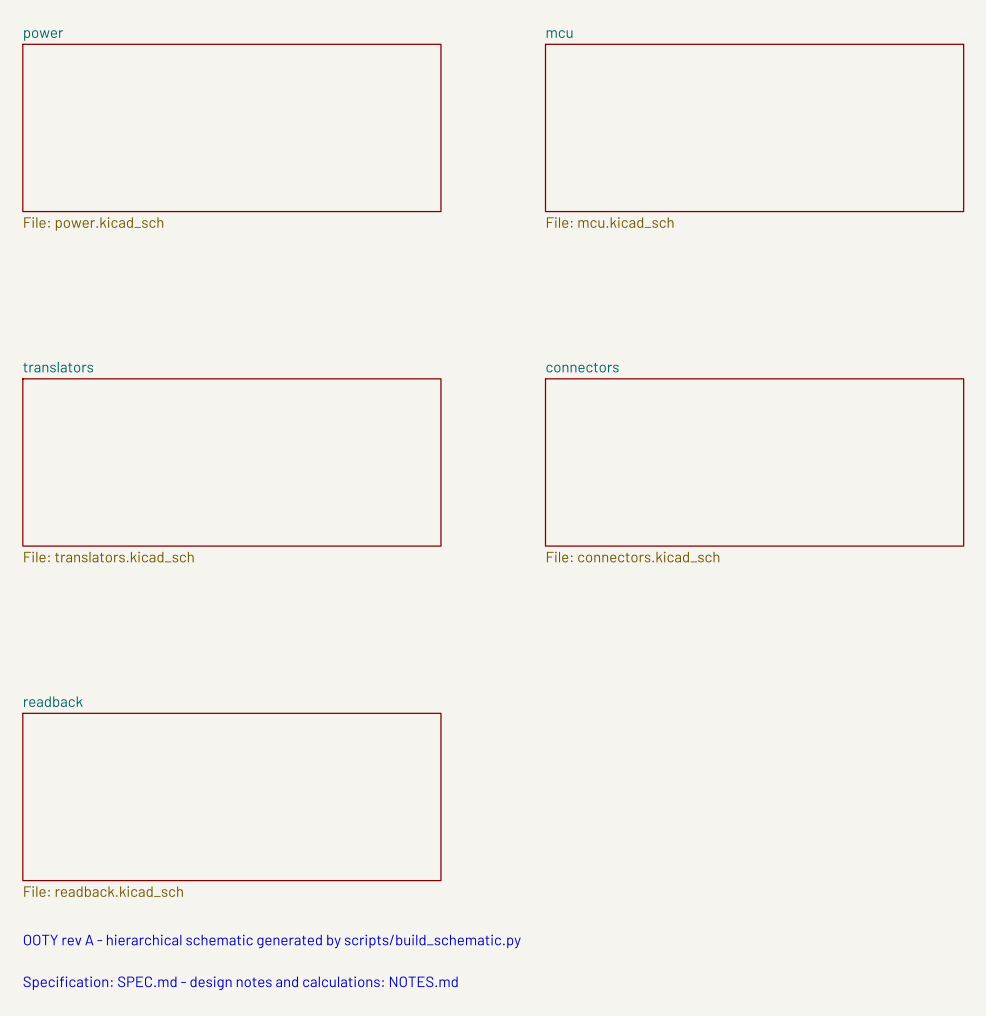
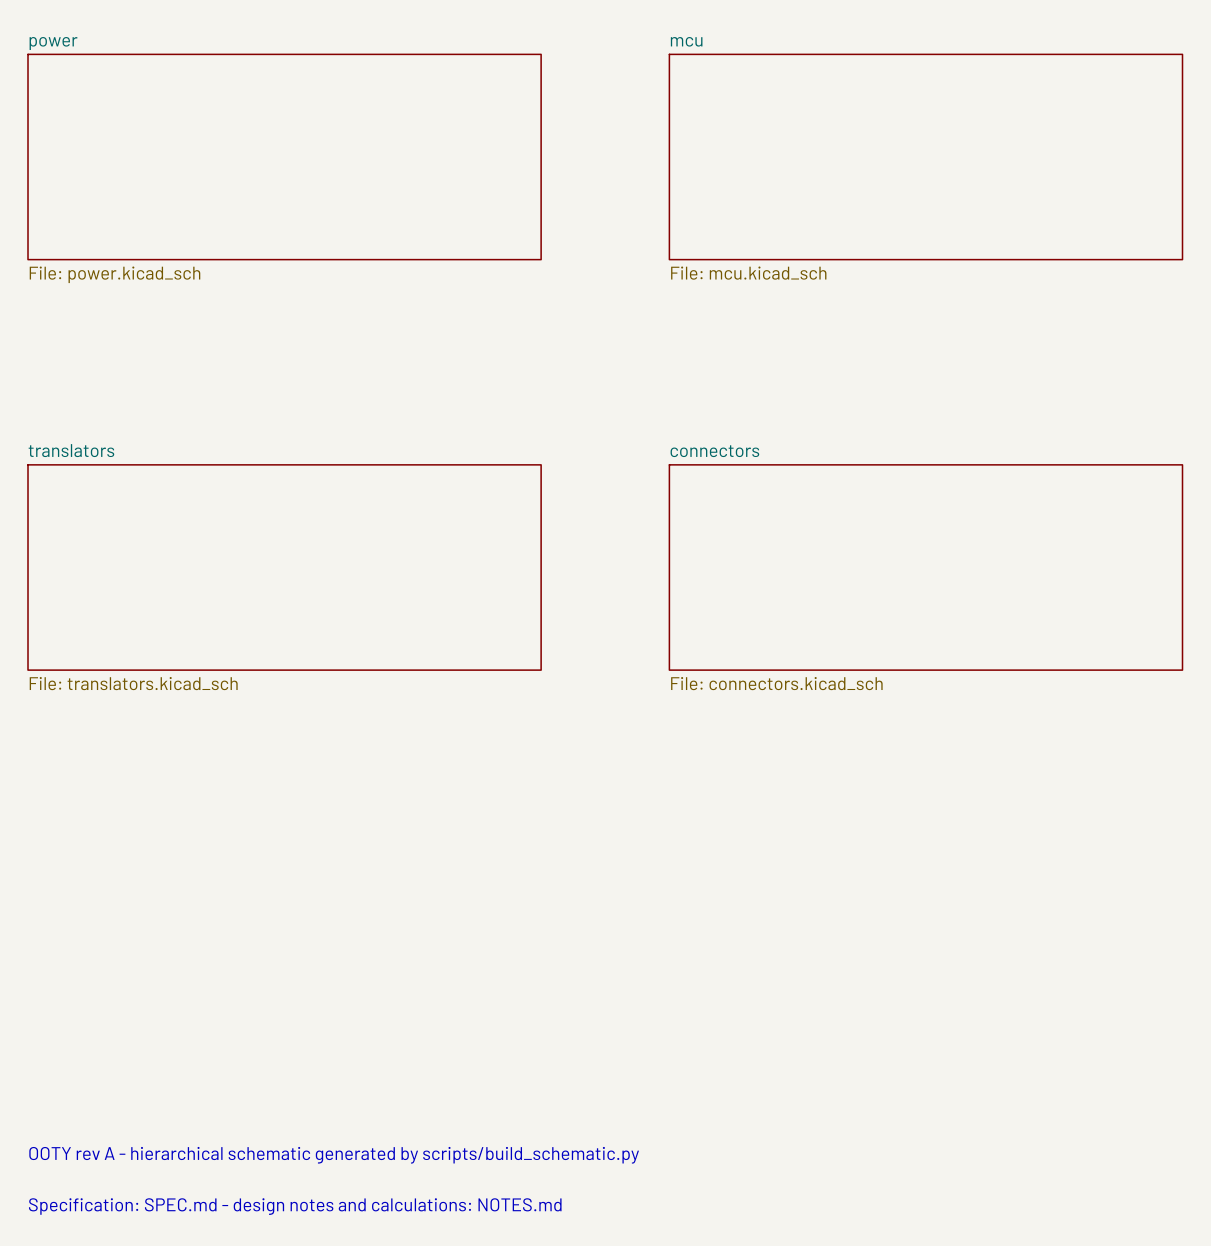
sheet readback: File: readback.kicad_sch (231, 796) -> none

